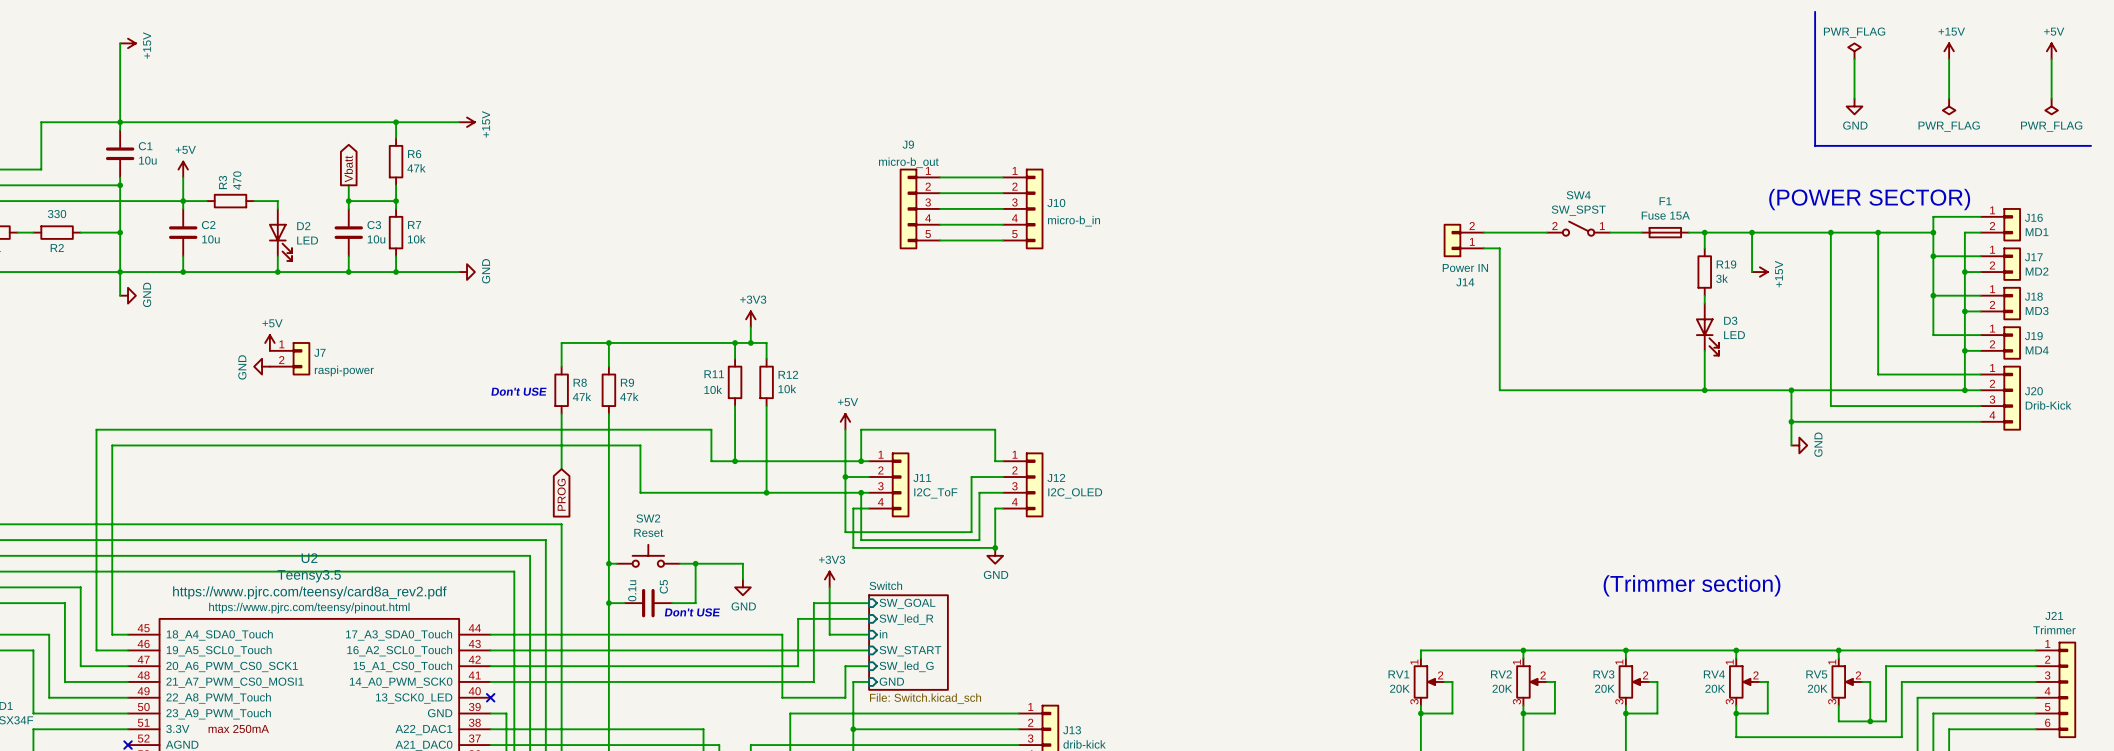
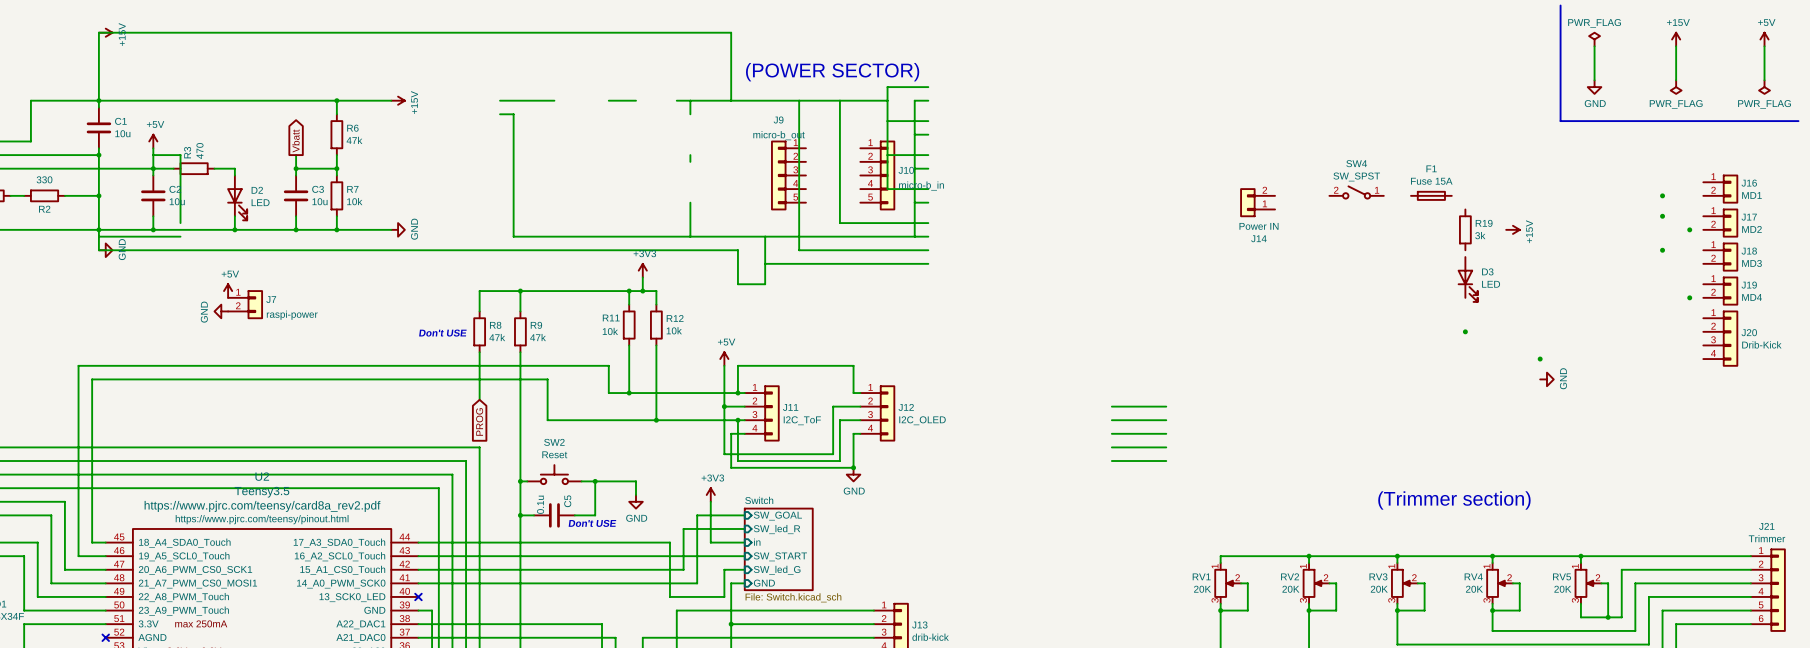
wire: none -> (98, 32) (731, 32) (731, 100)
text: none -> (POWER SECTOR) (832, 72)
wire: none -> (928, 87) (887, 87) (887, 189) (928, 189)
wire: none -> (500, 100) (554, 100)
wire: none -> (608, 100) (636, 100)
wire: none -> (676, 100) (887, 100)
wire: none -> (690, 100) (690, 114)
wire: none -> (799, 100) (799, 250) (928, 250)
wire: none -> (839, 100) (839, 223) (928, 223)
wire: none -> (928, 100) (914, 100) (914, 236)
wire: none -> (500, 114) (513, 114) (513, 236) (928, 236)
wire: none -> (887, 121) (928, 121)
wire: none -> (914, 134) (928, 134)
wire: (940, 177) (1003, 177) -> none
wire: none -> (153, 155) (180, 155) (180, 223)
wire: none -> (690, 155) (690, 161)
wire: none -> (887, 155) (928, 155)
wire: (940, 193) (1003, 193) -> none
text: (POWER SECTOR) (1869, 199) -> none
wire: none -> (914, 168) (928, 168)
wire: (940, 208) (1003, 208) -> none
wire: (1980, 216) (1933, 216) (1933, 335) (1980, 335) -> none
wire: (940, 224) (1003, 224) -> none
wire: (1483, 232) (1547, 232) -> none
wire: (1610, 232) (1641, 232) -> none
wire: (1688, 232) (1933, 232) -> none
wire: (1704, 232) (1704, 248) -> none
junction: (1704, 232) -> none
wire: (1752, 232) (1752, 272) -> none
junction: (1752, 232) -> none
wire: (1830, 232) (1830, 406) (1980, 406) -> none
junction: (1830, 232) -> none
wire: (1878, 232) (1878, 374) (1980, 374) -> none
junction: (1878, 232) -> none
wire: (1980, 232) (1964, 232) (1964, 390) -> none
wire: none -> (690, 202) (690, 236)
wire: (940, 240) (1003, 240) -> none
wire: none -> (914, 202) (928, 202)
wire: (1483, 248) (1499, 248) (1499, 390) (1980, 390) -> none
wire: (1933, 256) (1980, 256) -> none
wire: (1964, 272) (1980, 272) -> none
wire: none -> (98, 236) (180, 236)
wire: none -> (765, 236) (765, 284) (737, 284) (737, 250) (98, 250)
wire: (1704, 295) (1704, 303) -> none
wire: (1933, 295) (1980, 295) -> none
wire: none -> (765, 263) (928, 263)
wire: (1964, 311) (1980, 311) -> none
junction: (1964, 311) -> none
wire: (1704, 350) (1704, 390) -> none
wire: (1964, 350) (1980, 350) -> none
wire: (1791, 390) (1791, 445) -> none
junction: (1791, 390) -> none
junction: (1964, 390) -> none
wire: (1791, 421) (1980, 421) -> none
wire: none -> (1111, 406) (1166, 406)
wire: none -> (1111, 420) (1166, 420)
wire: none -> (1111, 433) (1166, 433)
wire: none -> (1111, 447) (1166, 447)
wire: none -> (1111, 461) (1166, 461)

